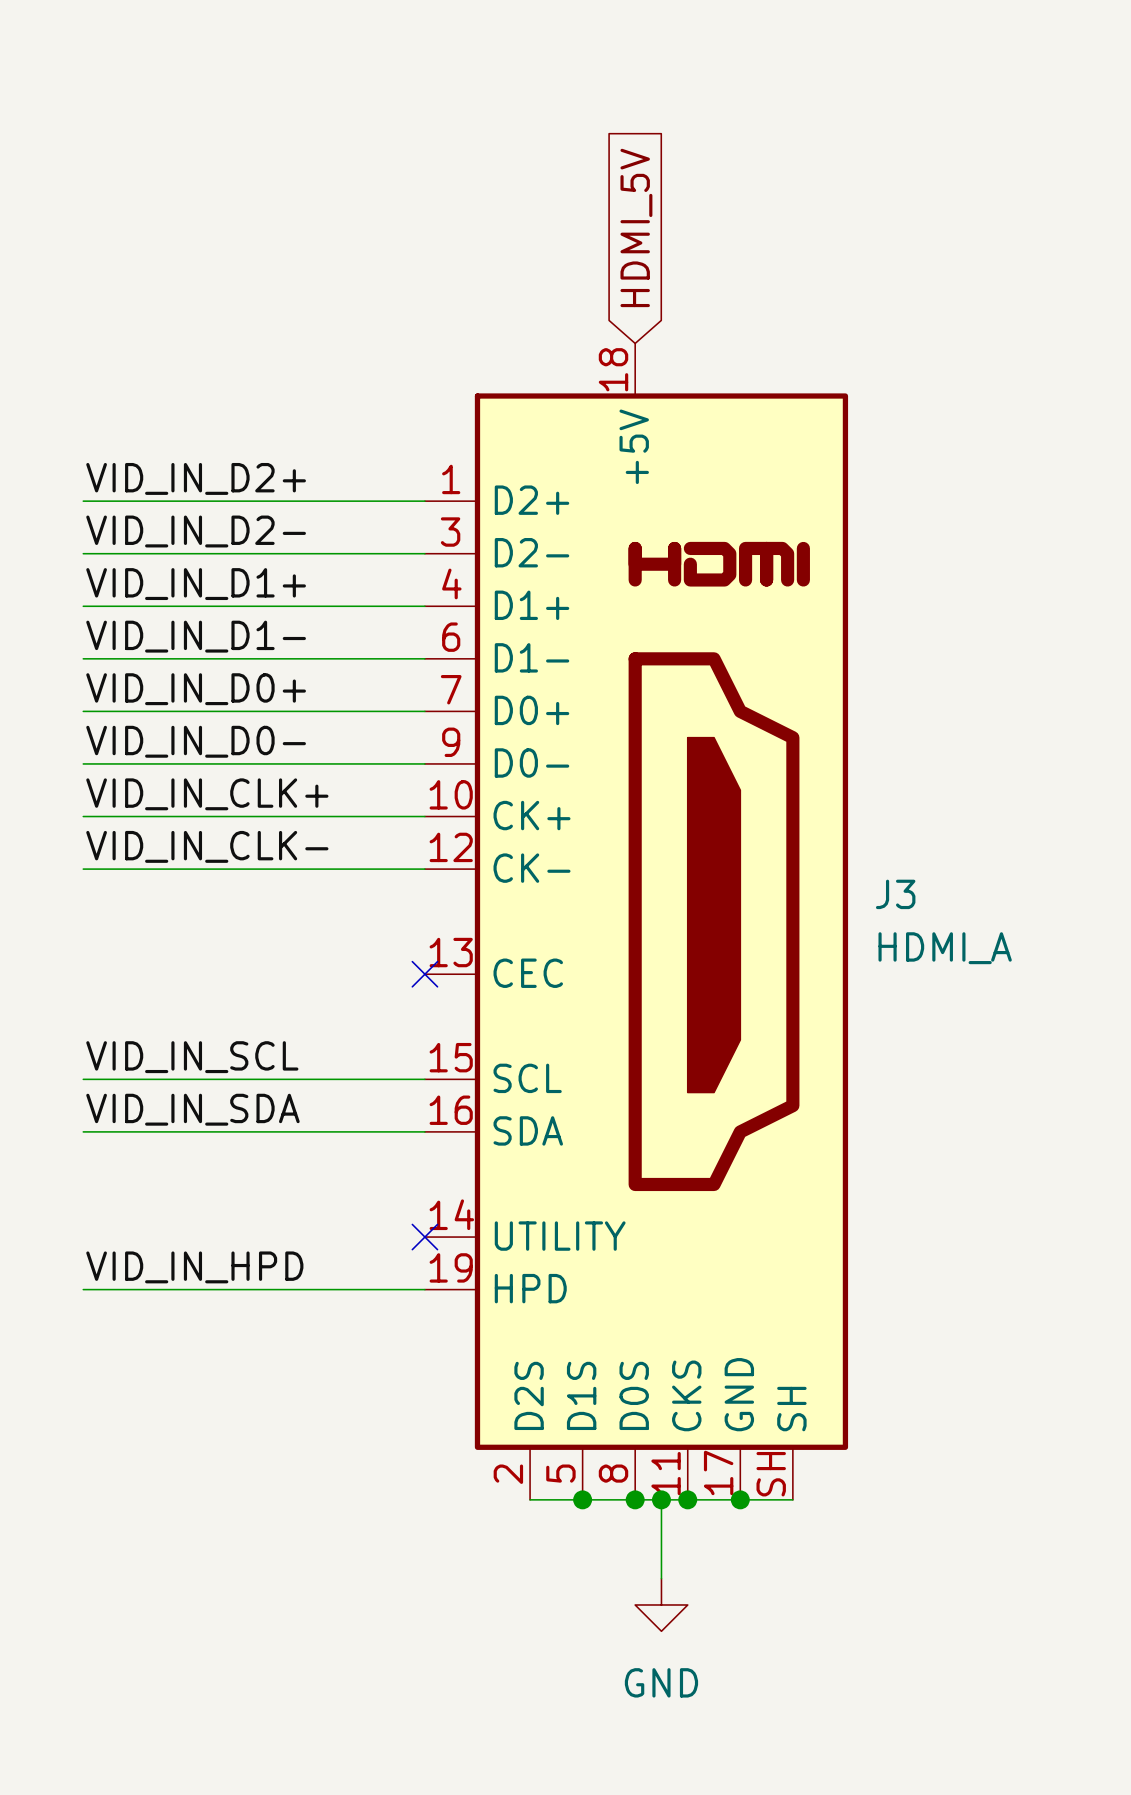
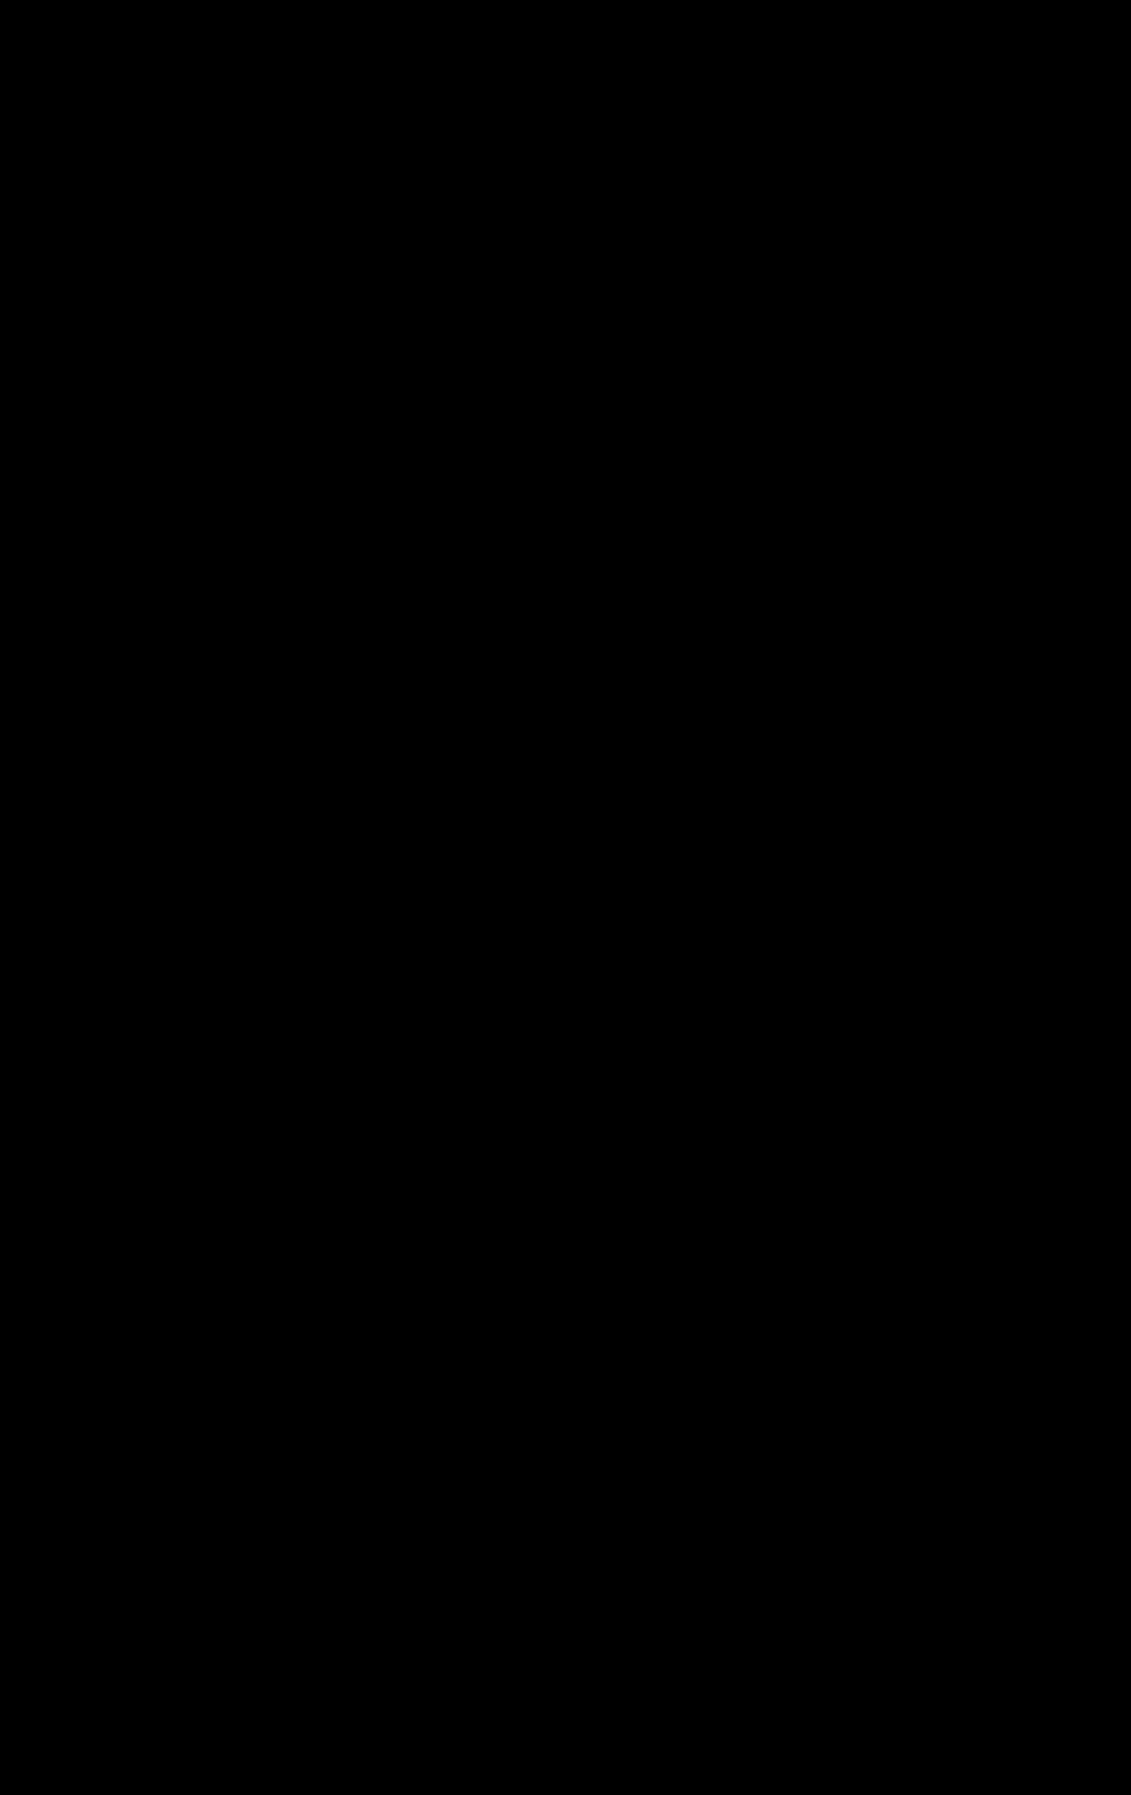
global label: HDMI_5V (636, 227) -> none
label: VID_IN_D2+ (196, 478) -> none
wire: (83, 501) (424, 501) -> none
label: VID_IN_D2- (196, 531) -> none
wire: (83, 553) (424, 553) -> none
label: VID_IN_D1+ (196, 584) -> none
wire: (83, 606) (424, 606) -> none
label: VID_IN_D1- (196, 636) -> none
wire: (83, 658) (424, 658) -> none
label: VID_IN_D0+ (196, 689) -> none
wire: (83, 711) (424, 711) -> none
label: VID_IN_D0- (196, 741) -> none
wire: (83, 763) (424, 763) -> none
label: VID_IN_CLK+ (207, 794) -> none
wire: (83, 816) (424, 816) -> none
label: VID_IN_CLK- (207, 846) -> none
wire: (83, 869) (424, 869) -> none
J3: HDMI_A (636, 921) -> none
no-connect mark: (424, 974) -> none
label: VID_IN_SCL (192, 1057) -> none
wire: (83, 1079) (424, 1079) -> none
label: VID_IN_SDA (192, 1109) -> none
wire: (83, 1131) (424, 1131) -> none
no-connect mark: (424, 1237) -> none
label: VID_IN_HPD (194, 1267) -> none
wire: (83, 1289) (424, 1289) -> none
wire: (530, 1499) (792, 1499) -> none
junction: (582, 1499) -> none
junction: (635, 1499) -> none
wire: (661, 1499) (661, 1578) -> none
junction: (661, 1499) -> none
junction: (687, 1499) -> none
junction: (740, 1499) -> none
power symbol: GND (661, 1604) -> none

